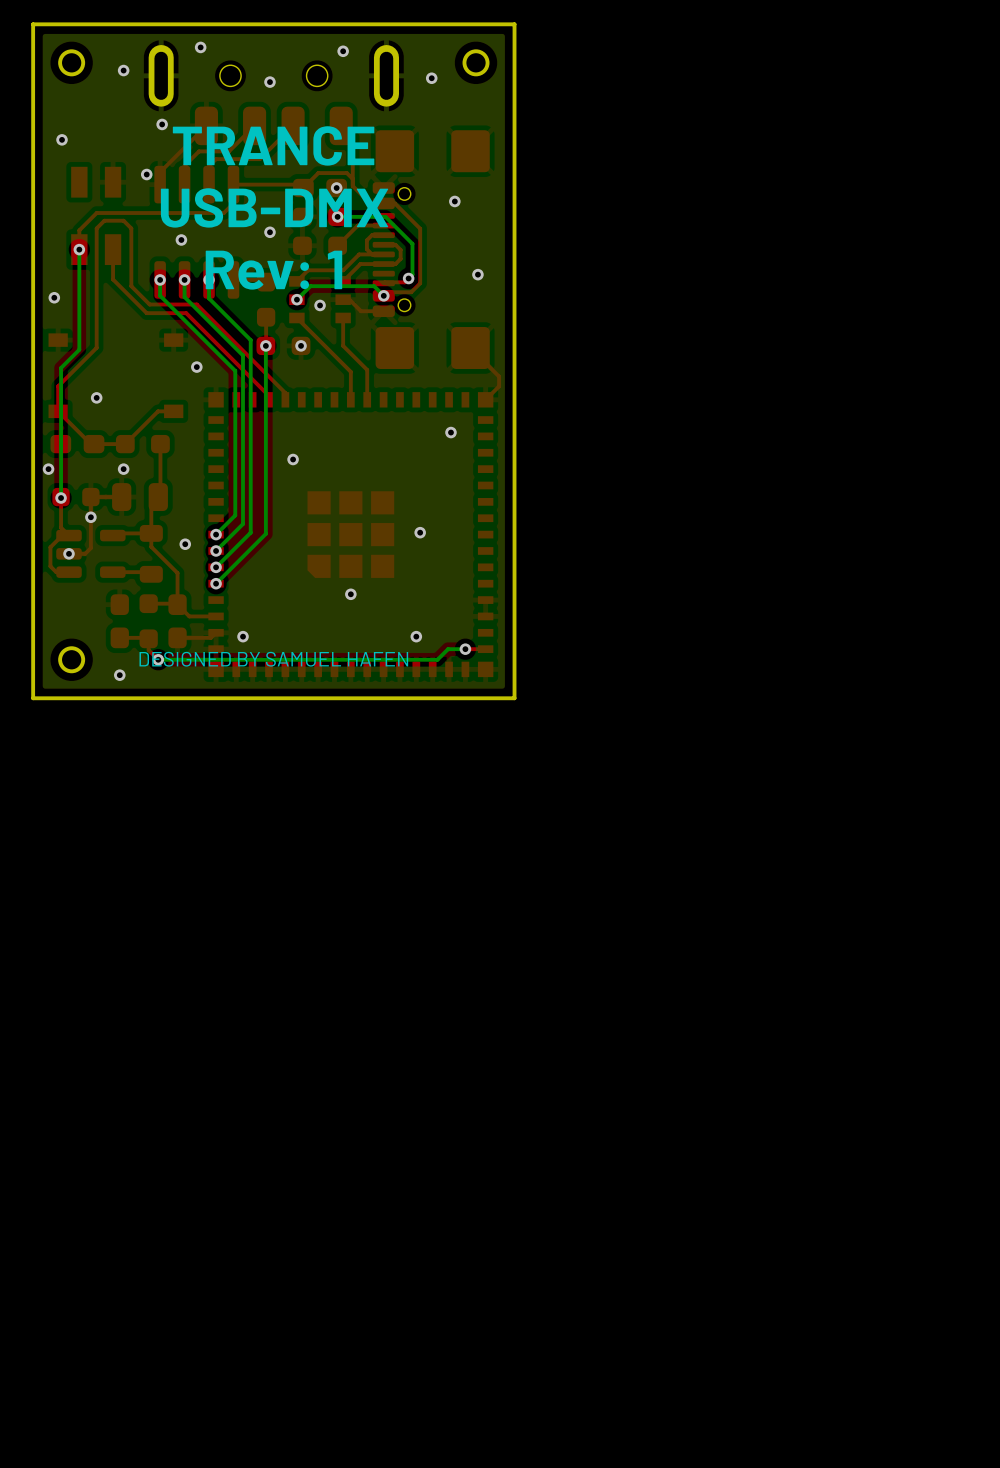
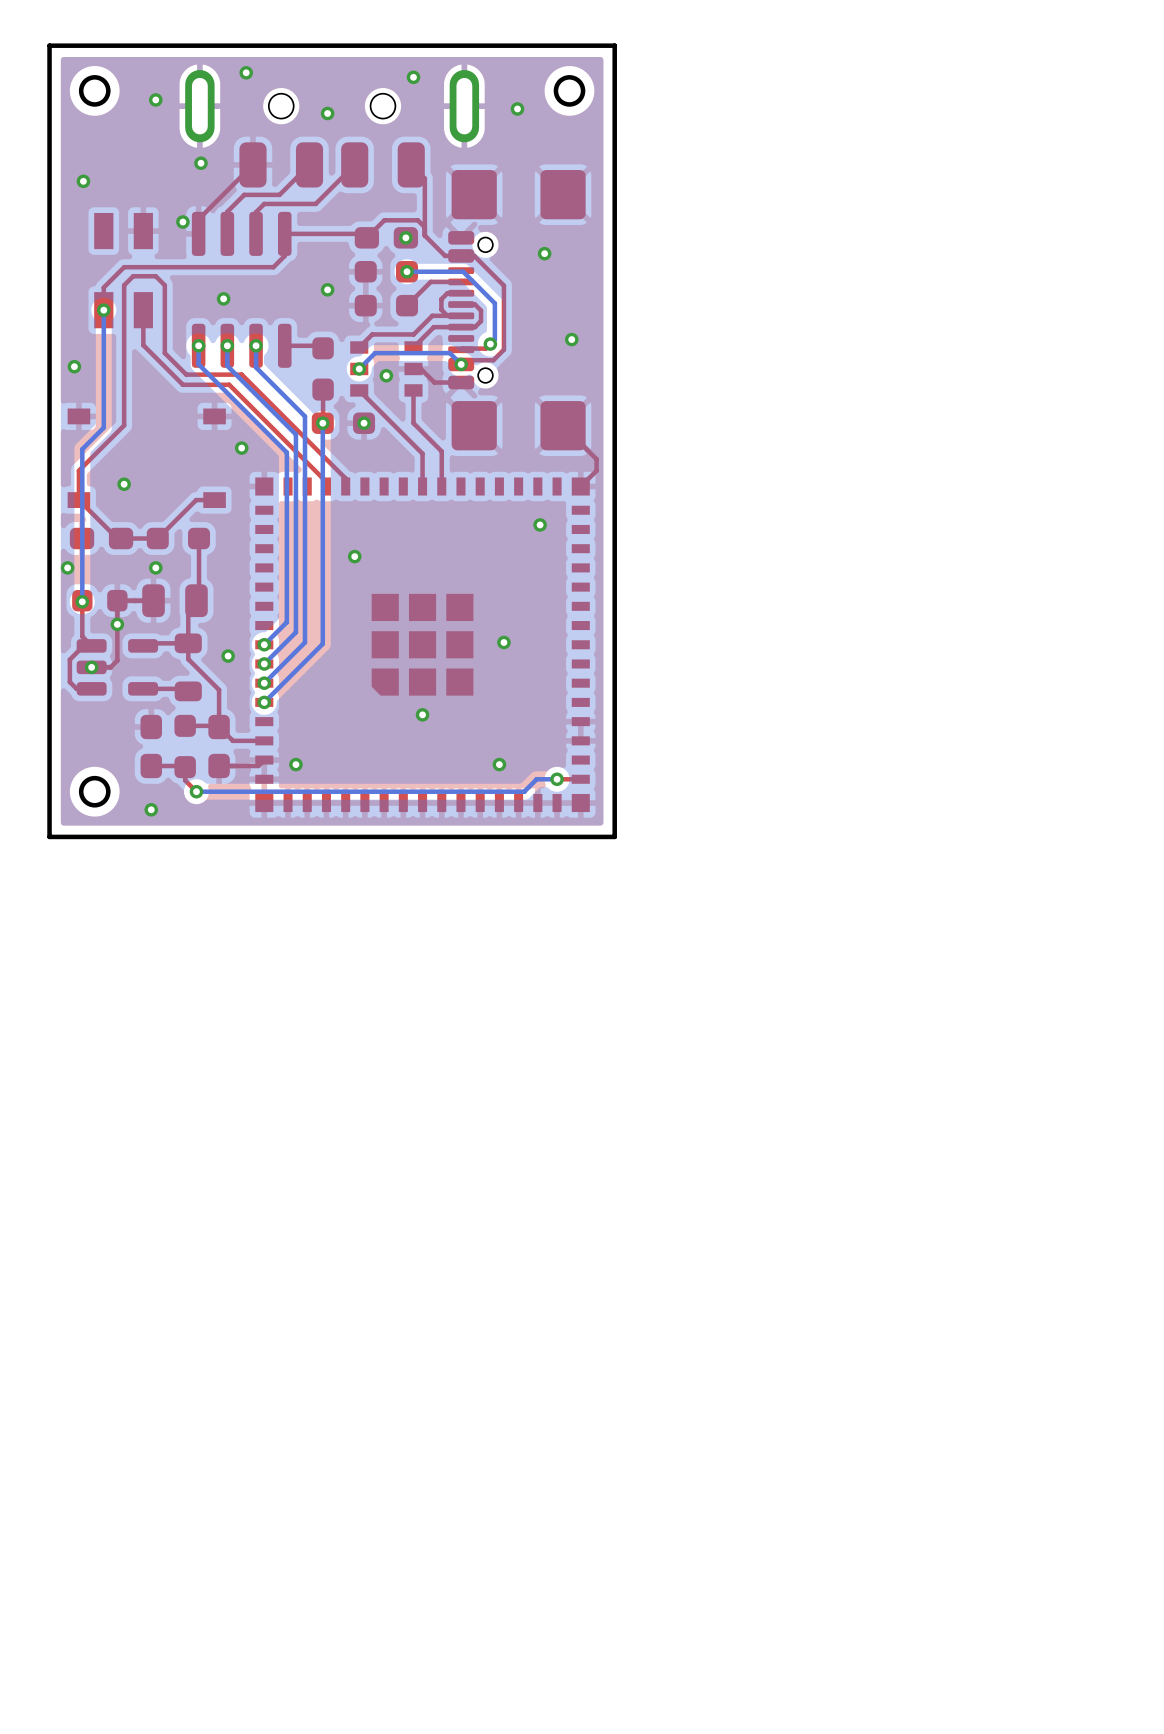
text: TRANCE (273, 145) -> none
text: USB-DMX (274, 207) -> none
text: Rev: 1 (273, 270) -> none
text: DESIGNED BY SAMUEL HAFEN (273, 659) -> none

